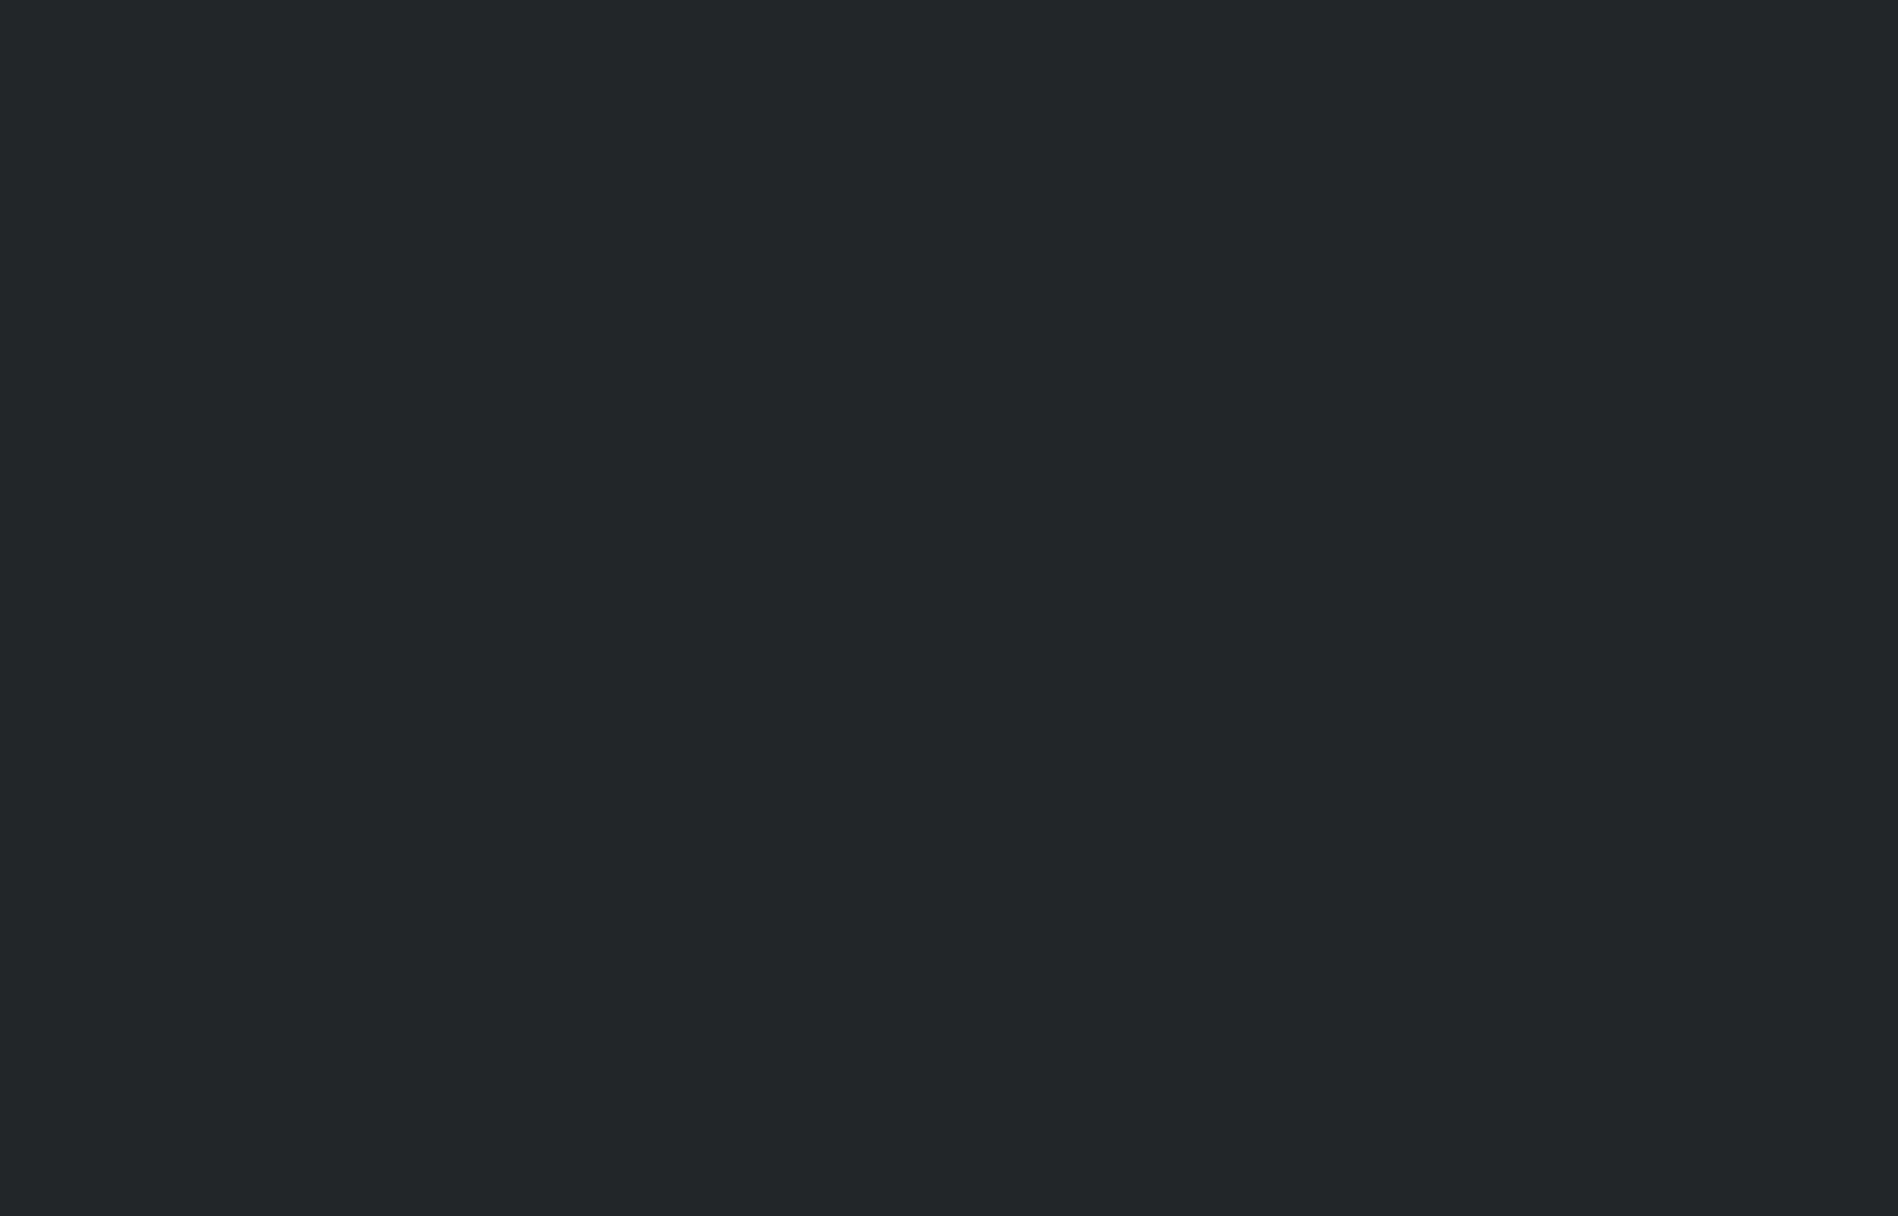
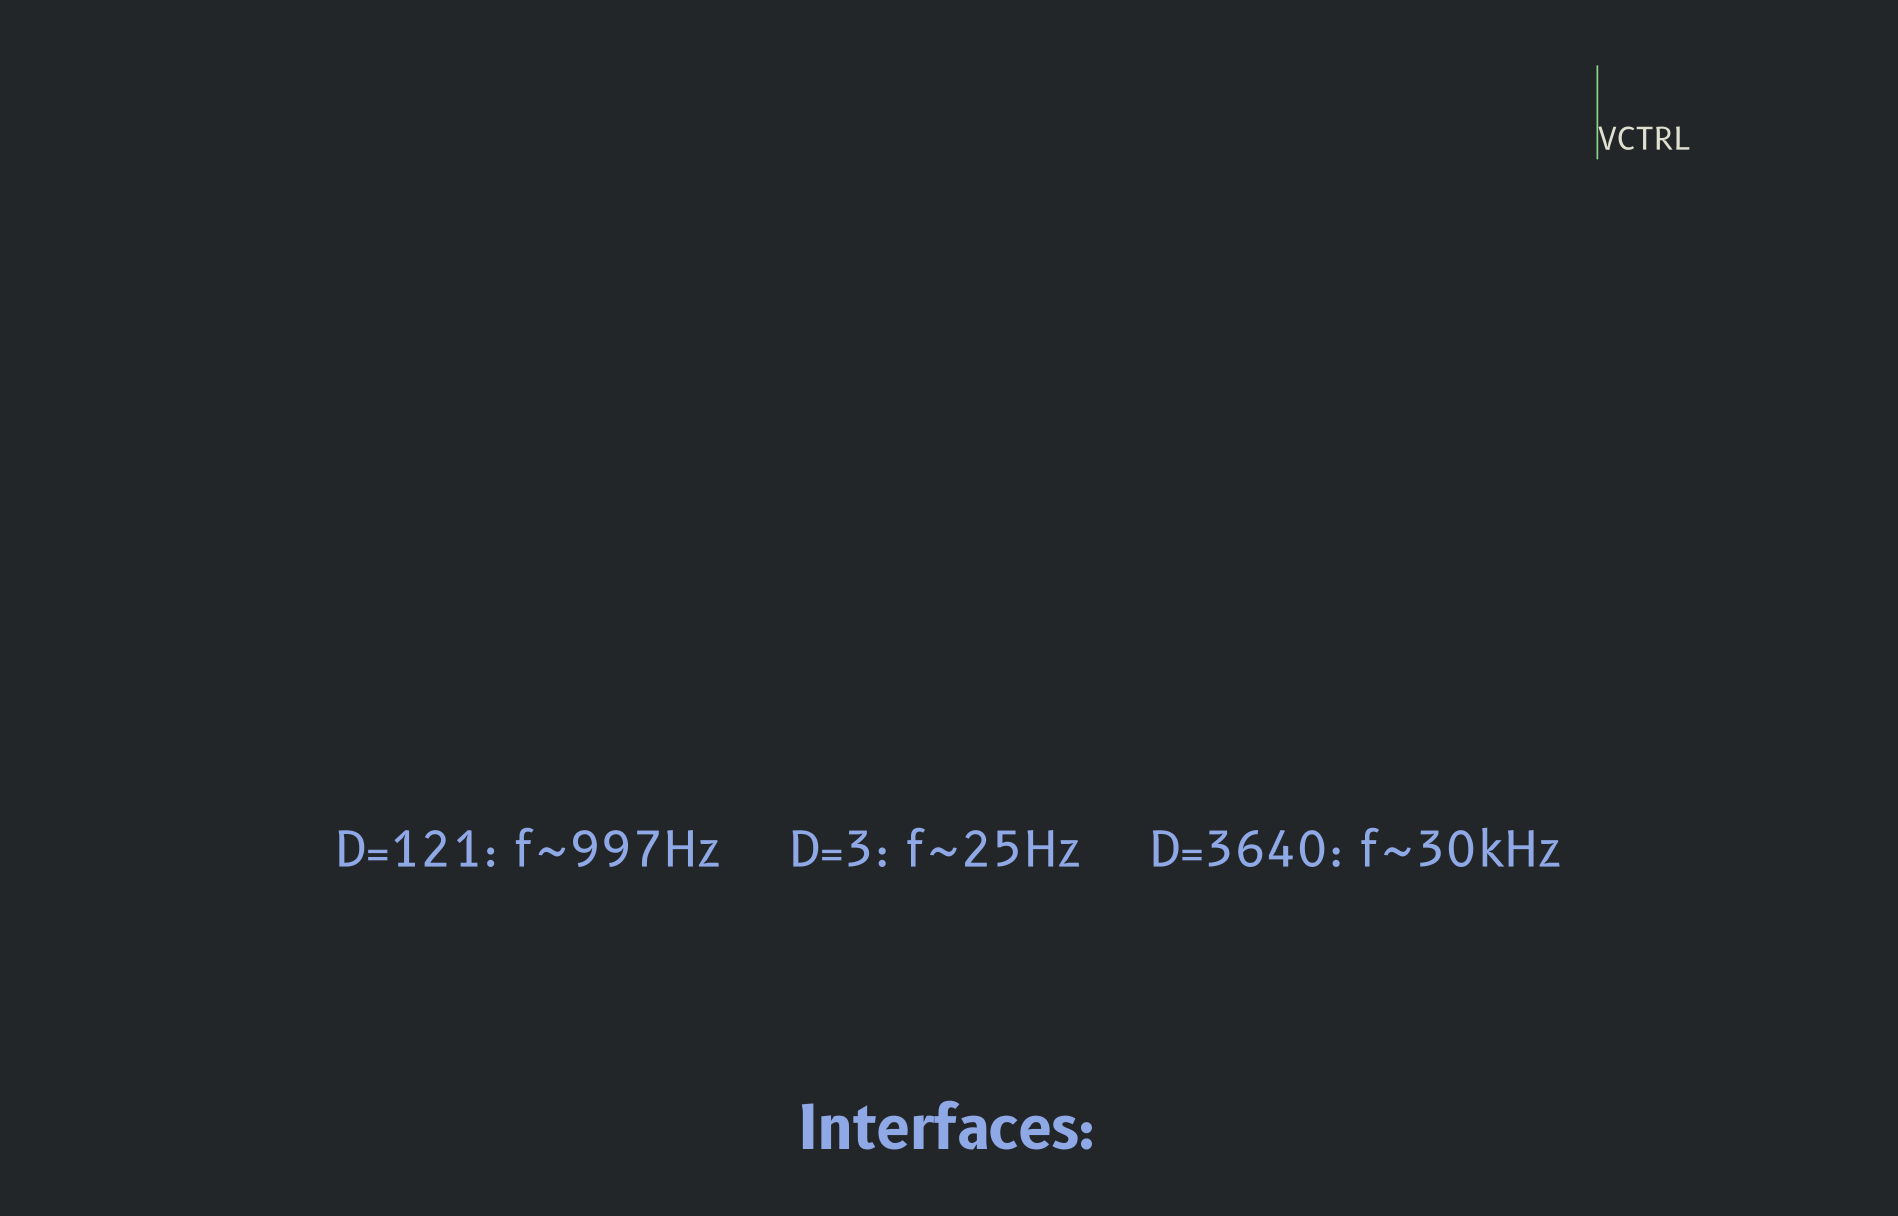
wire: none -> (1597, 66) (1597, 158)
label: none -> VCTRL (1643, 138)
text: none -> D=121: f~997Hz D=3: f~25Hz D=3640: f~30kHz (949, 847)
text: none -> Interfaces: (946, 1125)

